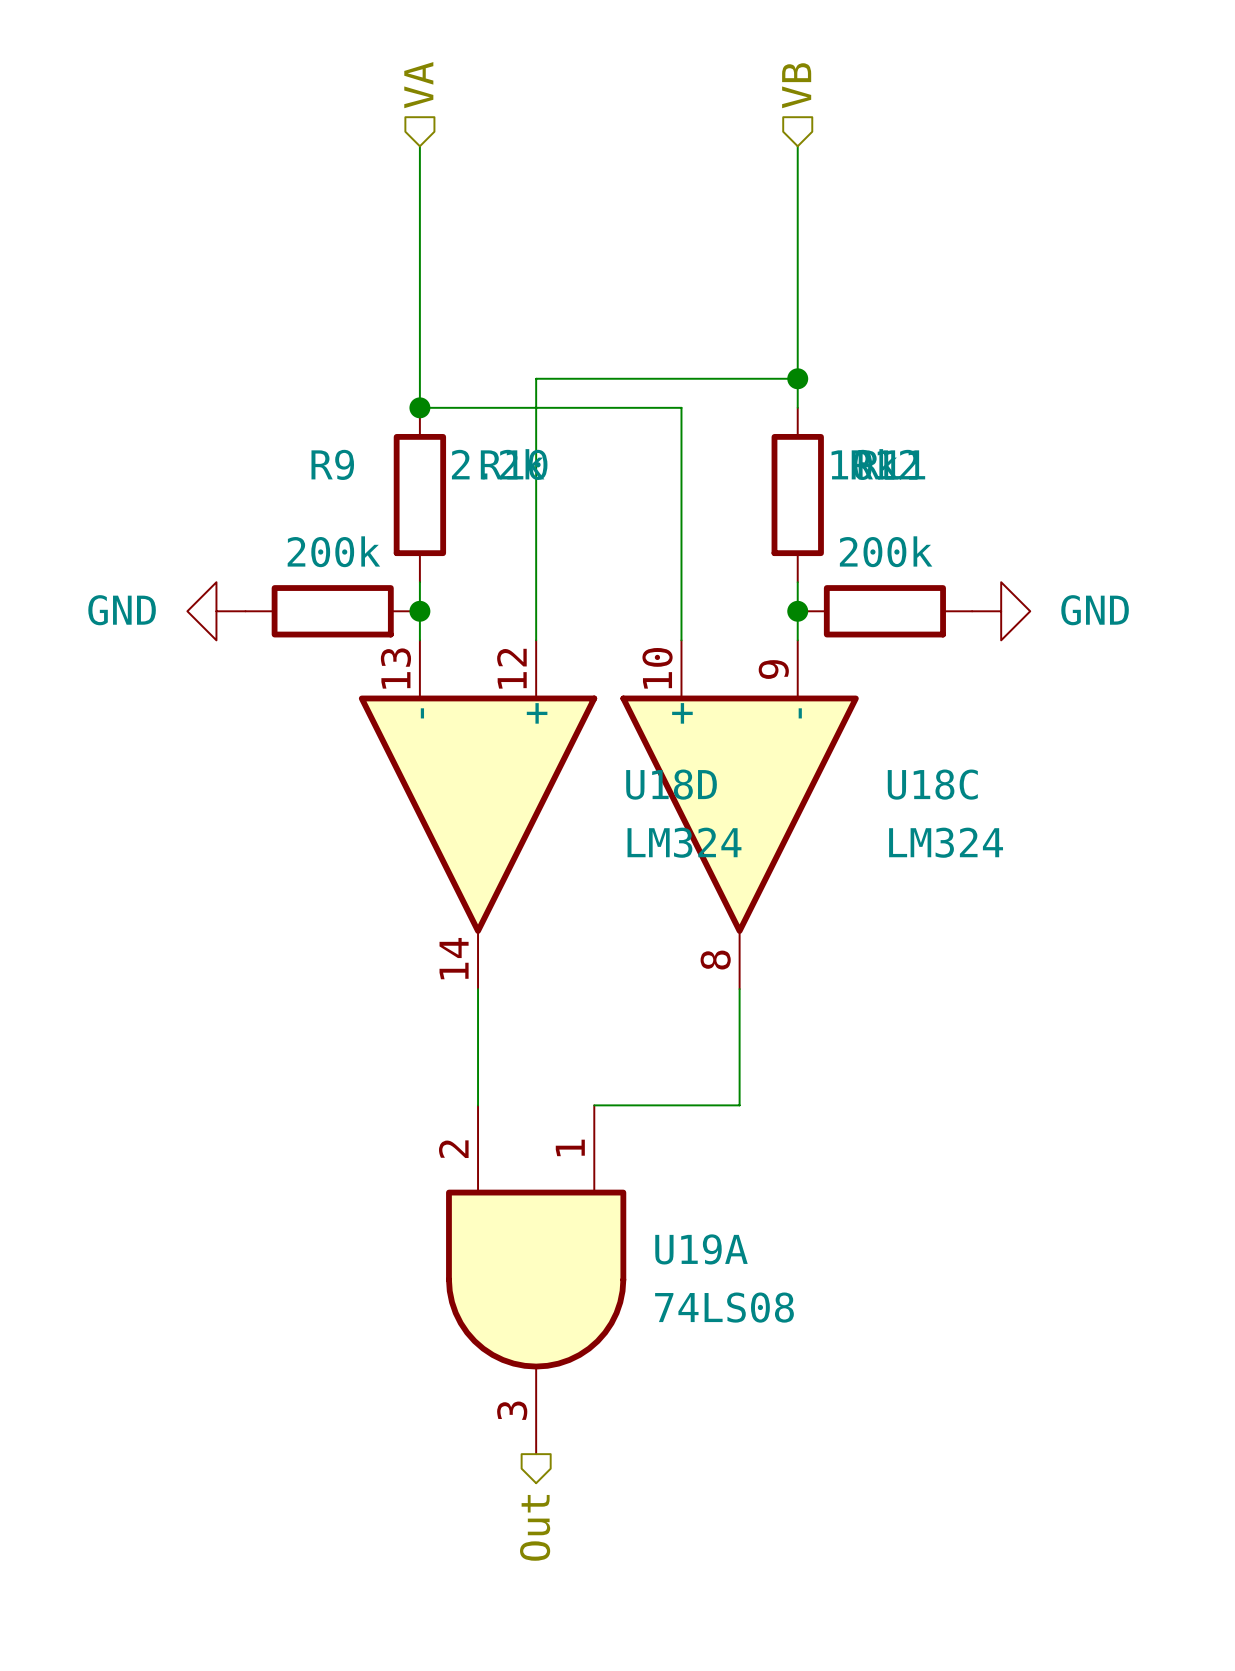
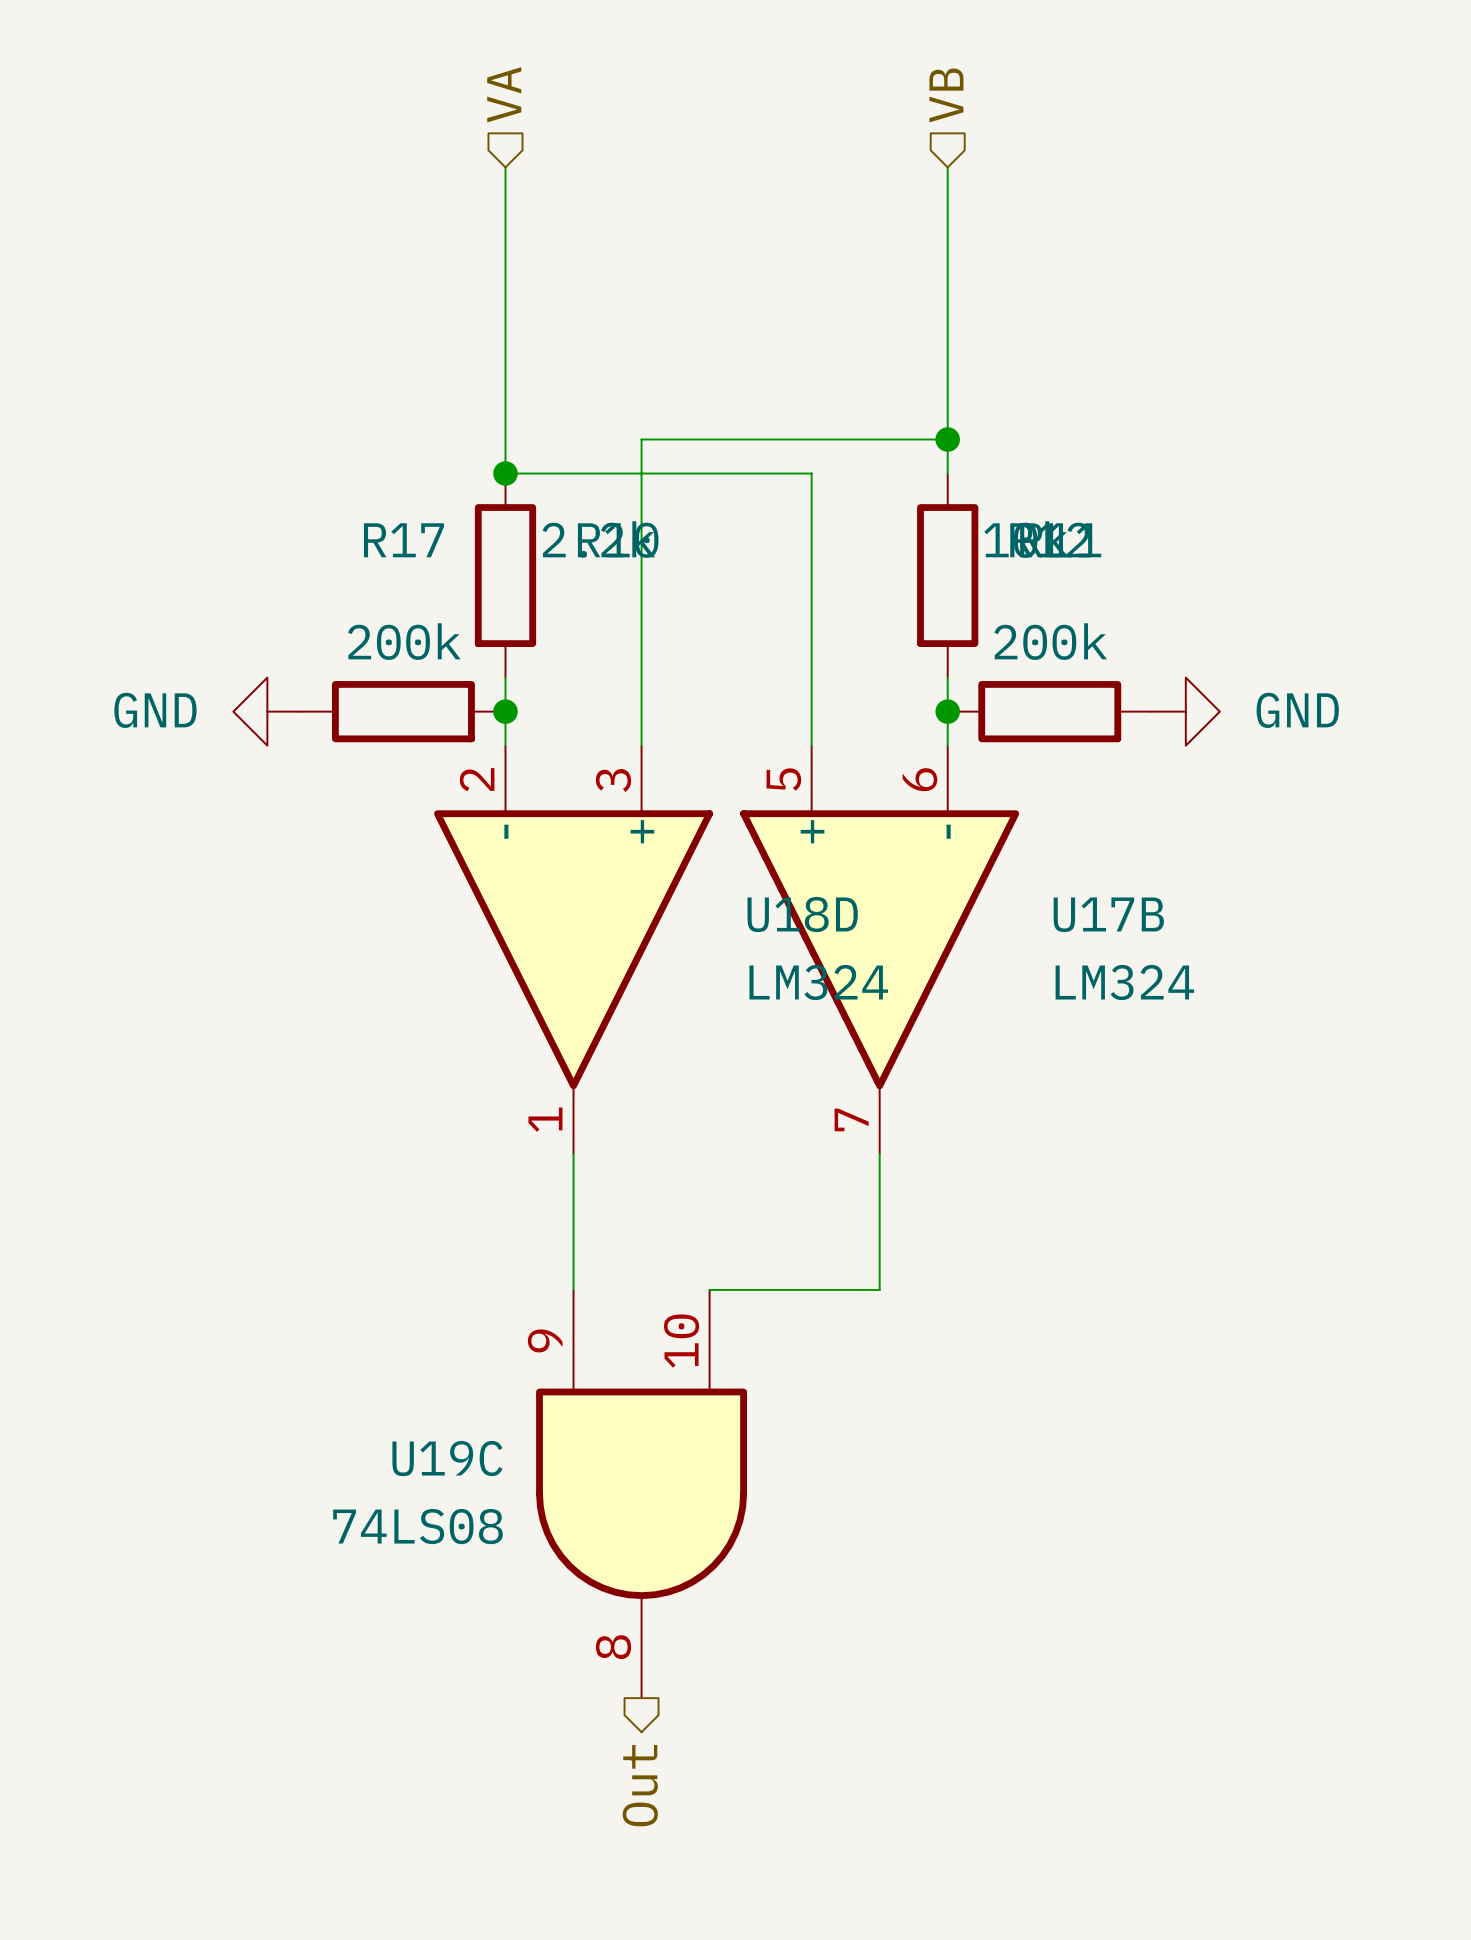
R9 name: R9 (332, 464) -> R17 (403, 540)
U18D pin number: 13 (395, 668) -> 2 (477, 779)
U18D pin number: 12 (511, 668) -> 3 (613, 780)
U18C pin number: 10 (657, 668) -> 5 (783, 779)
U18C pin number: 9 (773, 669) -> 6 (919, 779)
U18C name: U18C (932, 784) -> U17B (1108, 914)
U18D pin number: 14 (454, 958) -> 1 (545, 1119)
U18C pin number: 8 (715, 960) -> 7 (851, 1119)
U19A pin number: 1 (570, 1147) -> 10 (681, 1341)
U19A pin number: 2 (453, 1149) -> 9 (545, 1340)
U19A name: U19A (701, 1249) -> U19C (447, 1458)
U19A value position: 74LS08 (724, 1307) -> 74LS08 (418, 1526)
U19A pin number: 3 (512, 1410) -> 8 (613, 1647)

